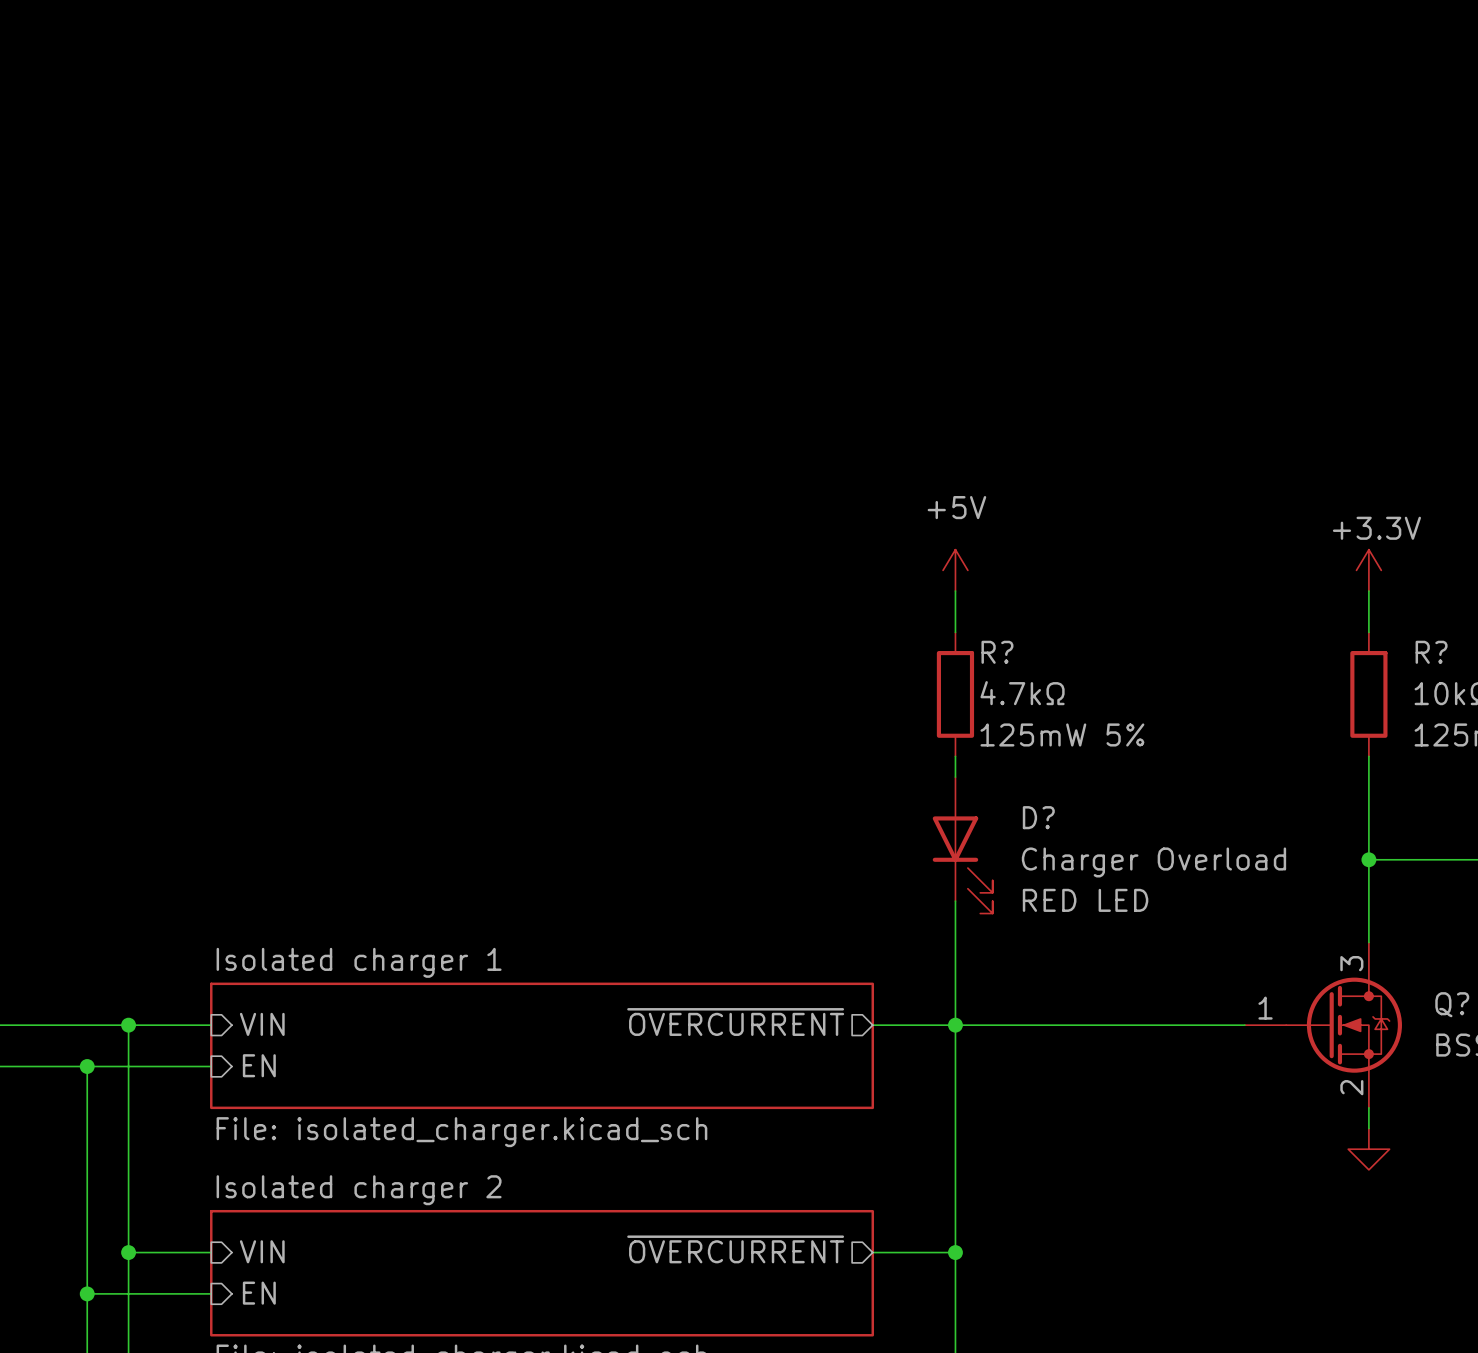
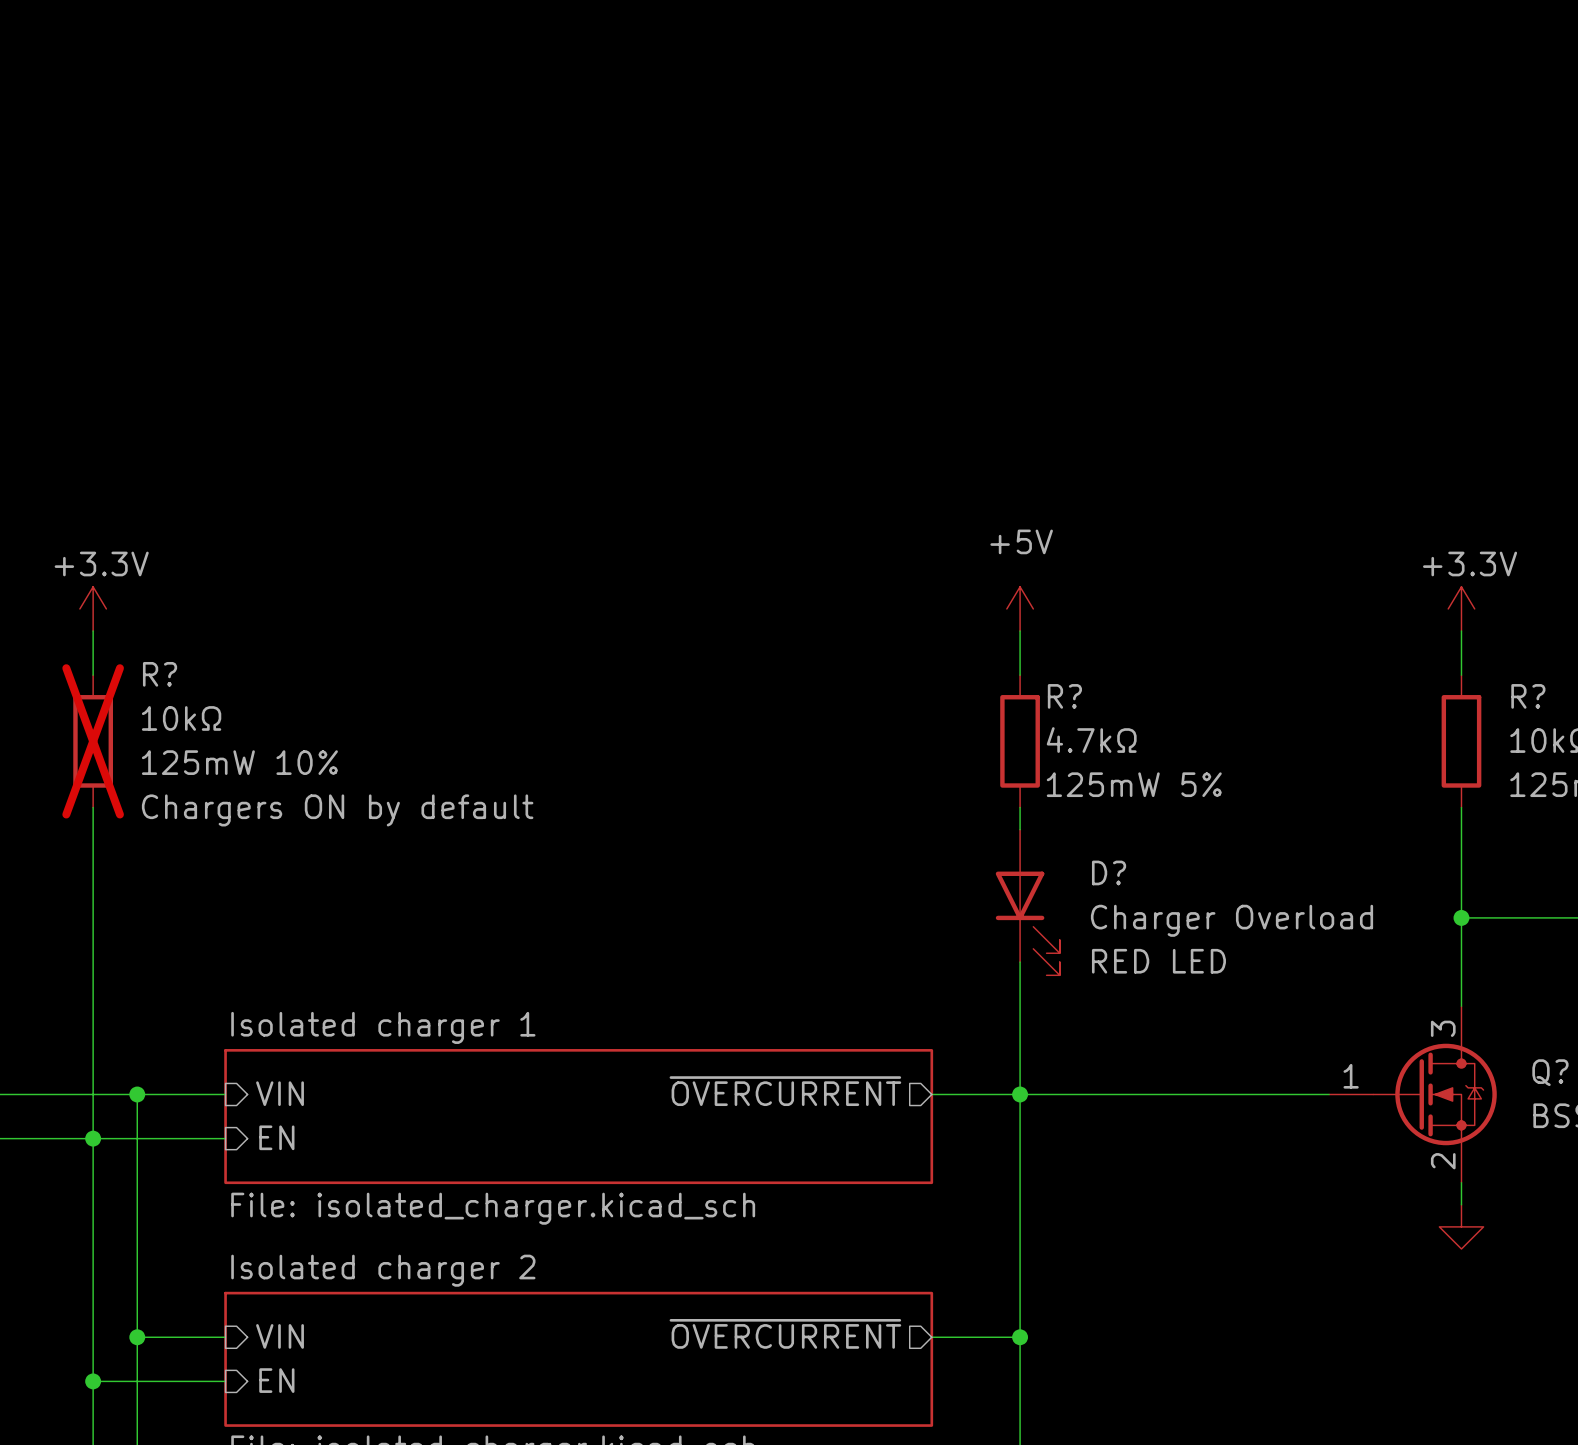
power symbol: none -> +3.3V (93, 608)
wire: none -> (93, 631) (93, 675)
R?: none -> 10kΩ (93, 741)
wire: none -> (93, 807) (93, 1138)

